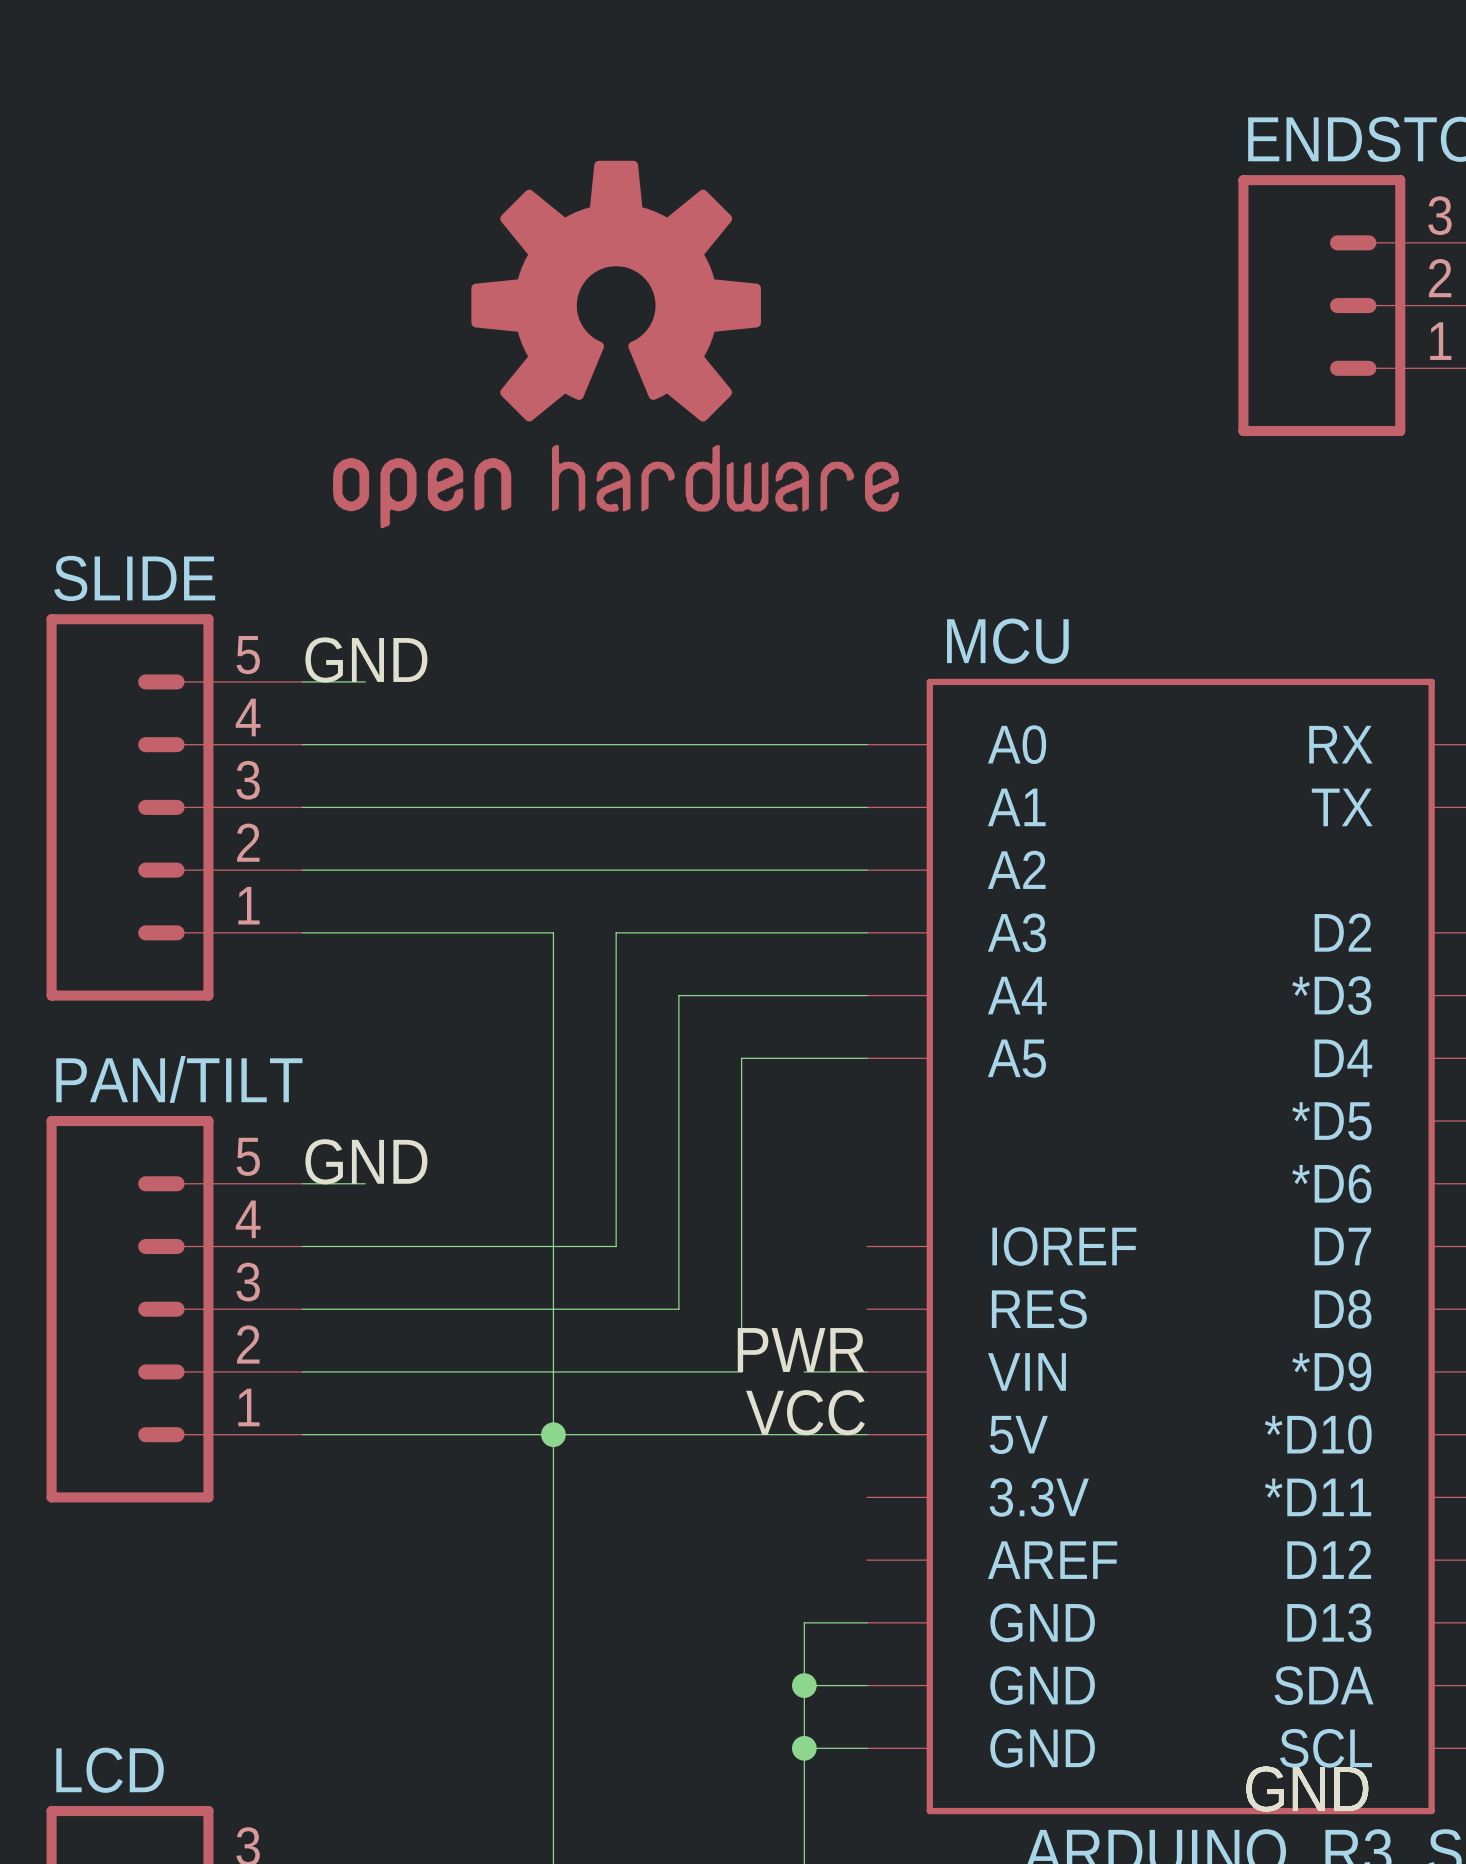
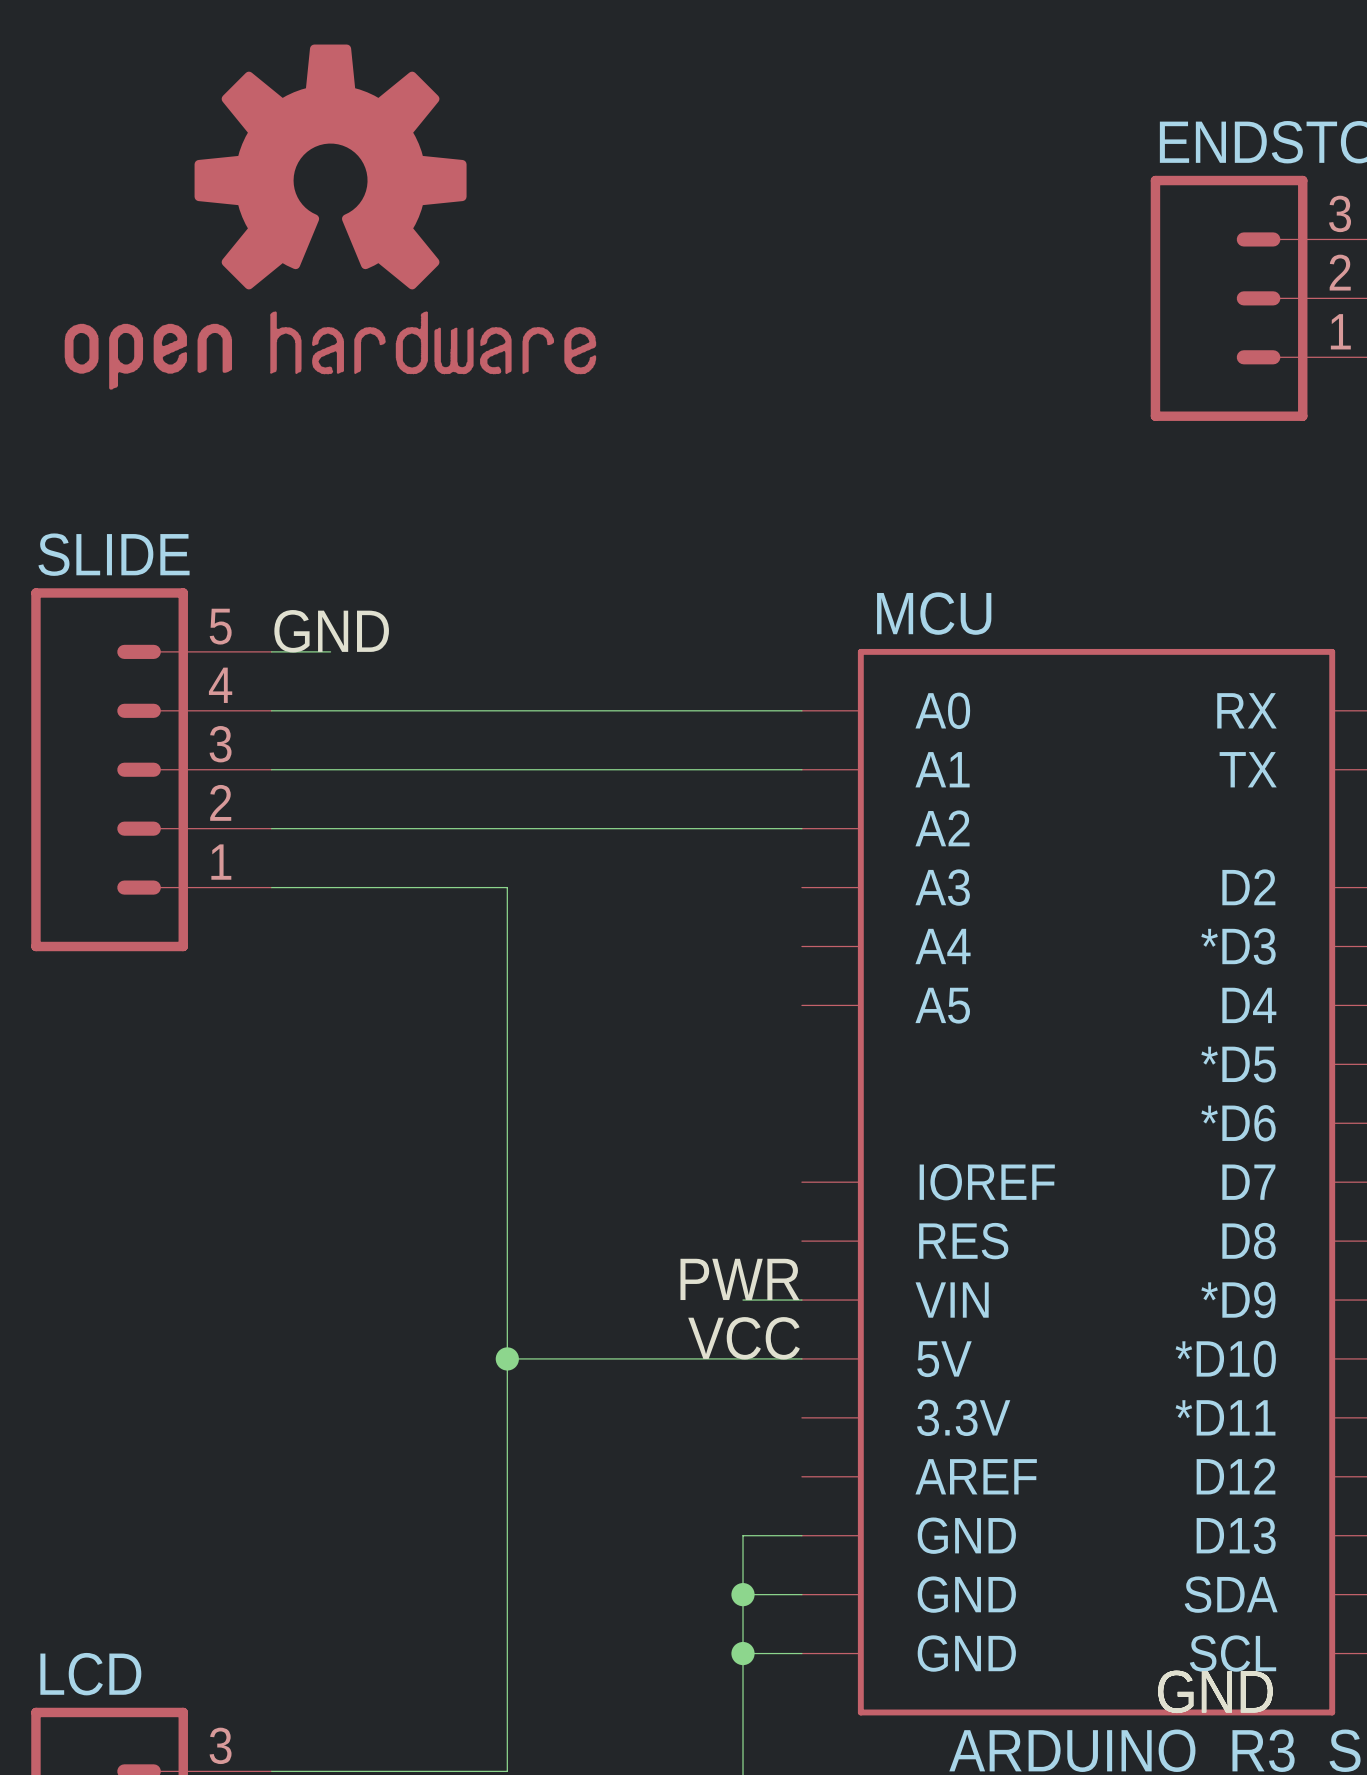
part position: (616, 344) -> (330, 217)
wire: (867, 932) (616, 932) (616, 1246) (302, 1246) -> none
wire: (867, 995) (678, 995) (678, 1309) (302, 1309) -> none
wire: (867, 1058) (741, 1058) (741, 1371) (302, 1371) -> none
label: GND (366, 1161) -> none
wire: (302, 1183) (365, 1183) -> none
PAN/TILT: (174, 1309) -> none
wire: (302, 1434) (553, 1434) -> none

